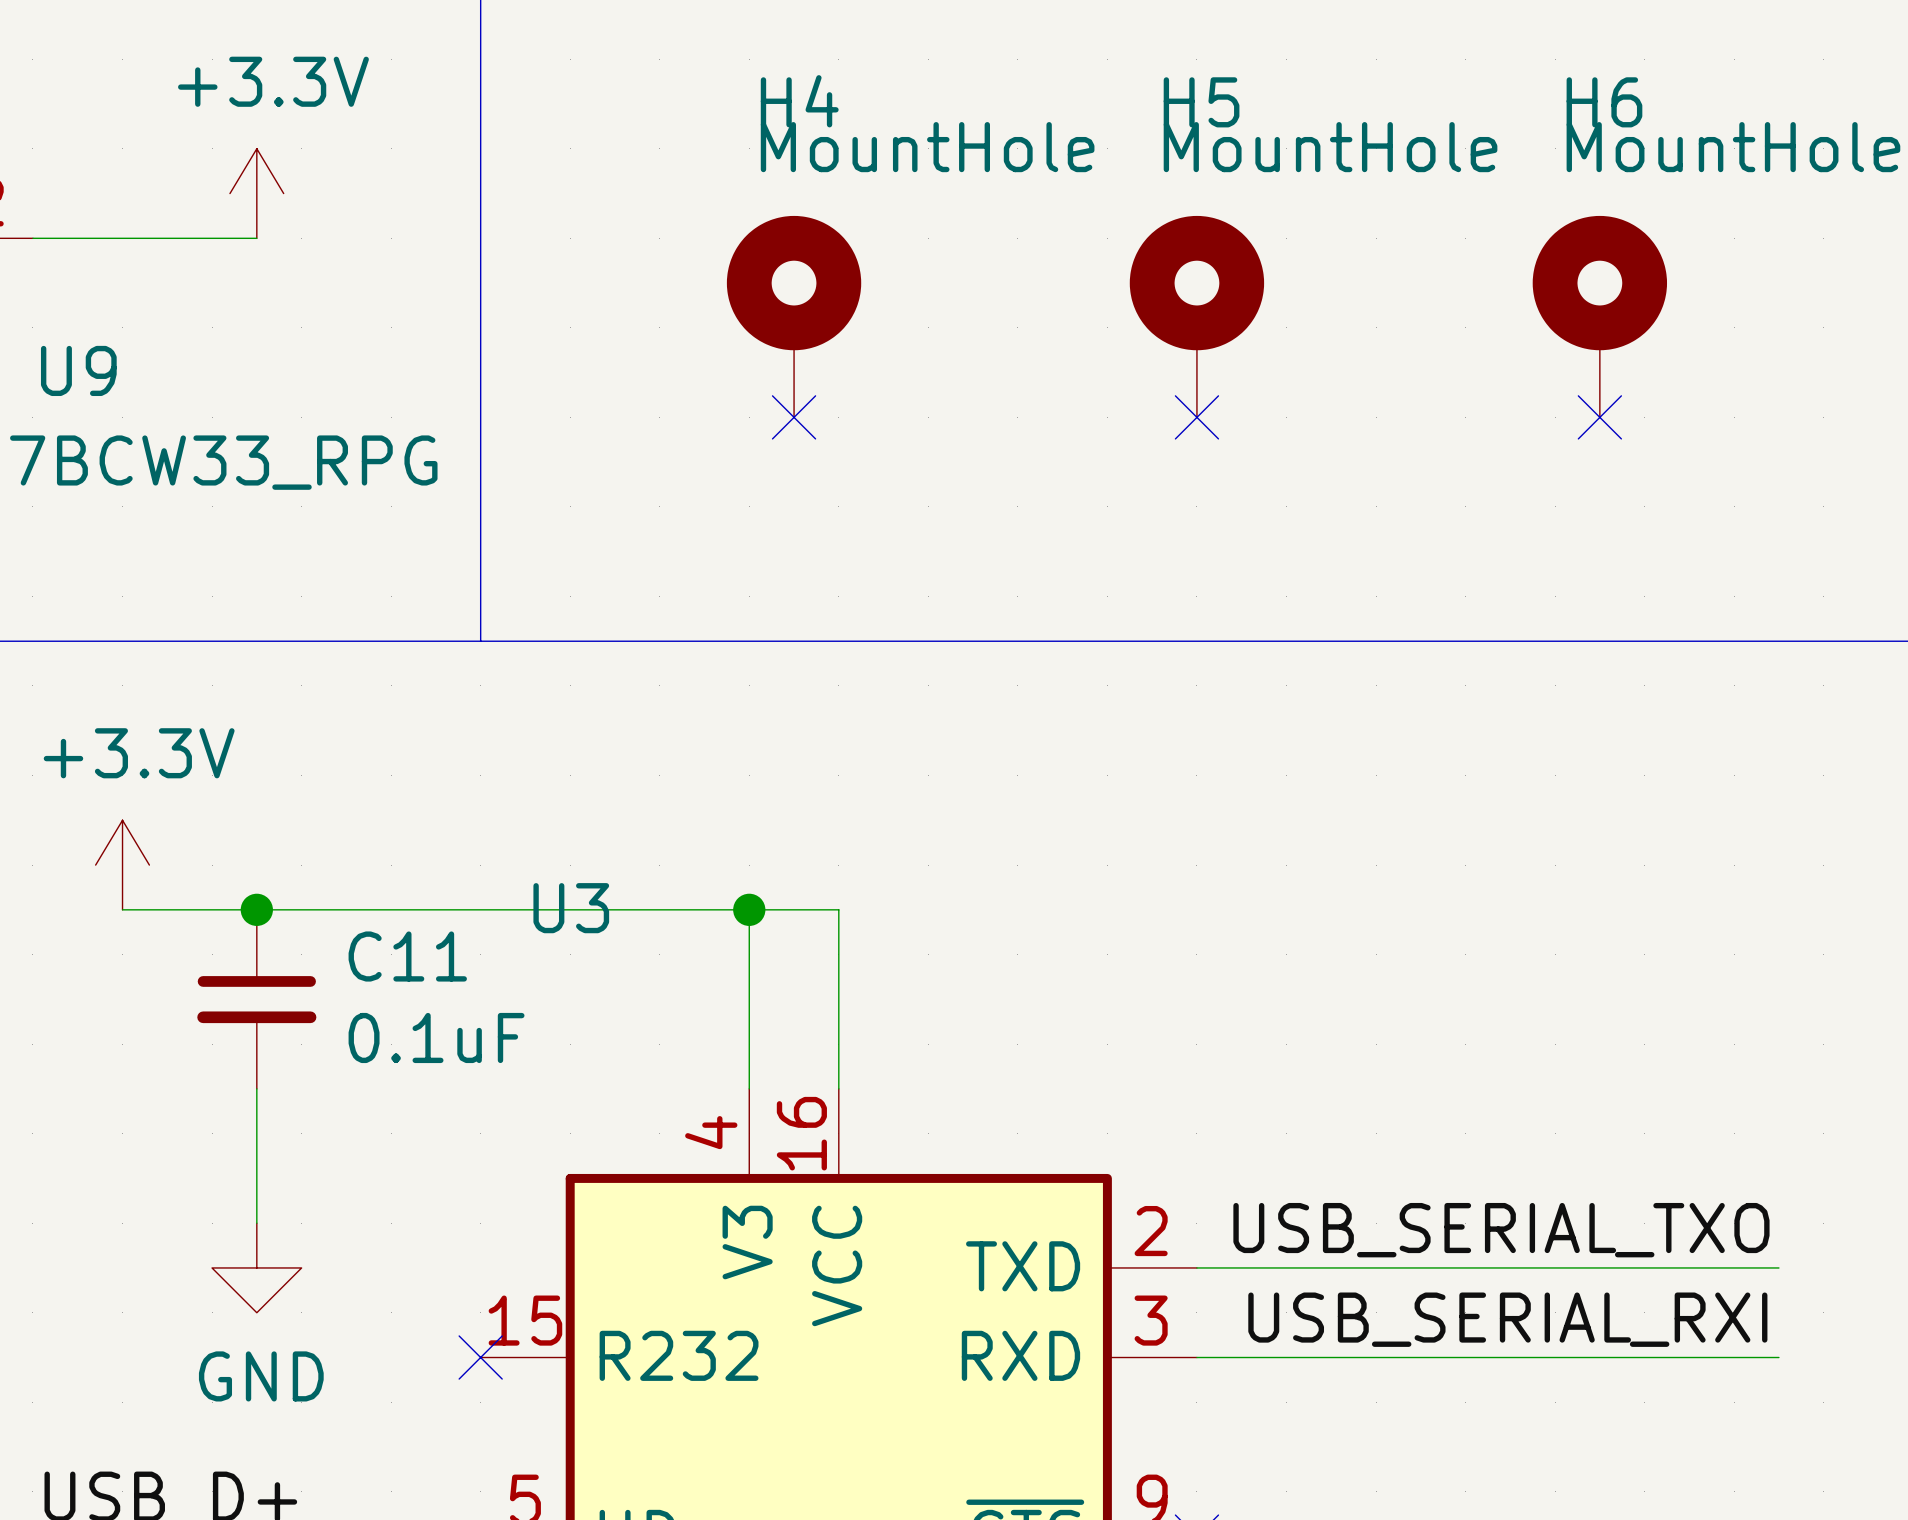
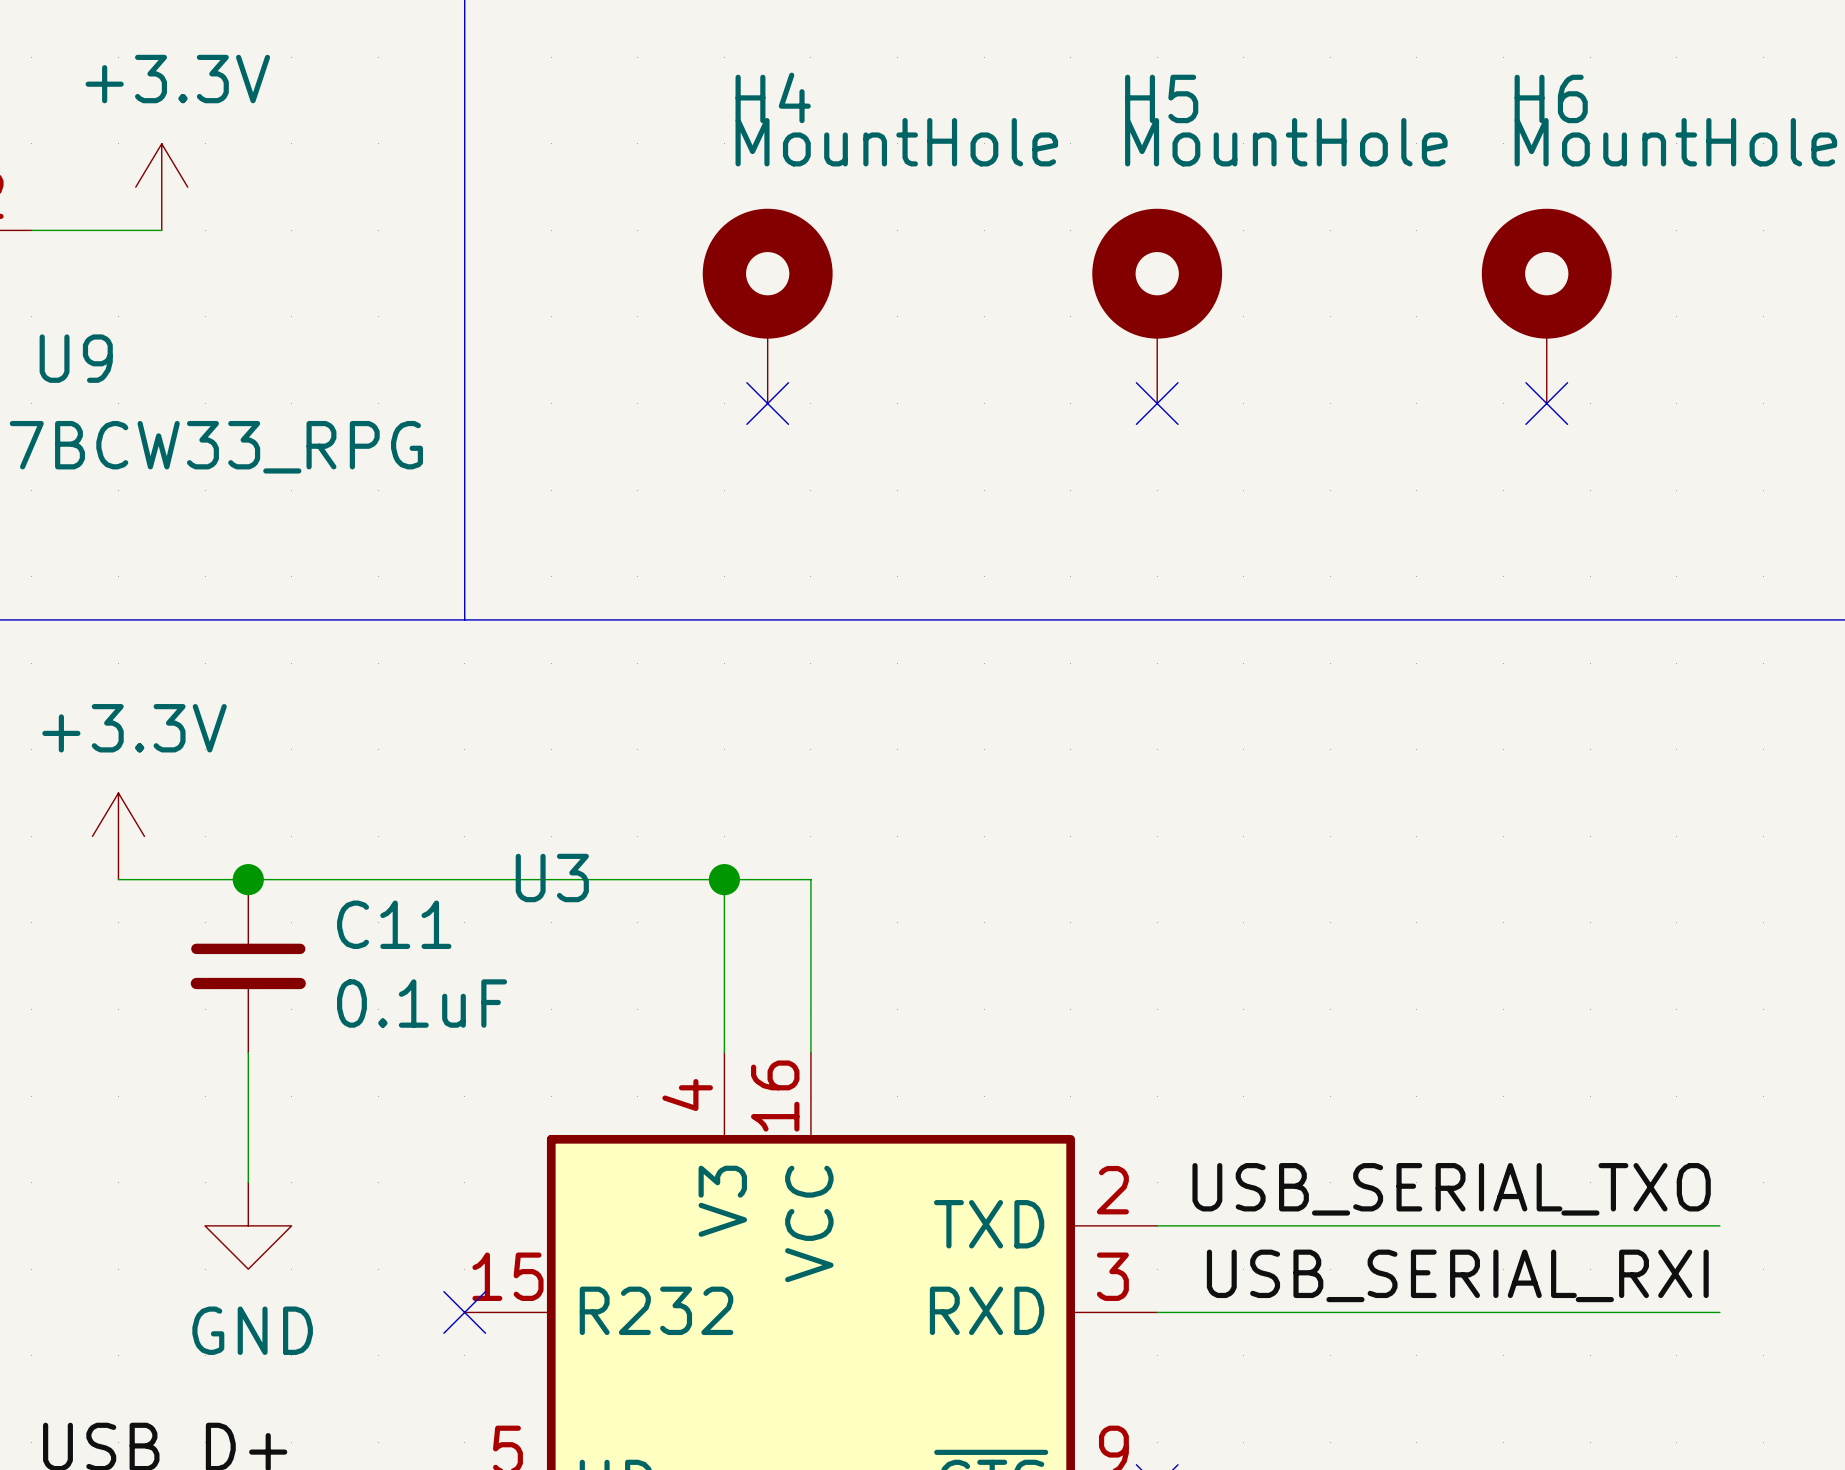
power symbol position: +3.3V (256, 193) -> +3.3V (161, 187)
wire: (167, 238) (256, 238) -> none

